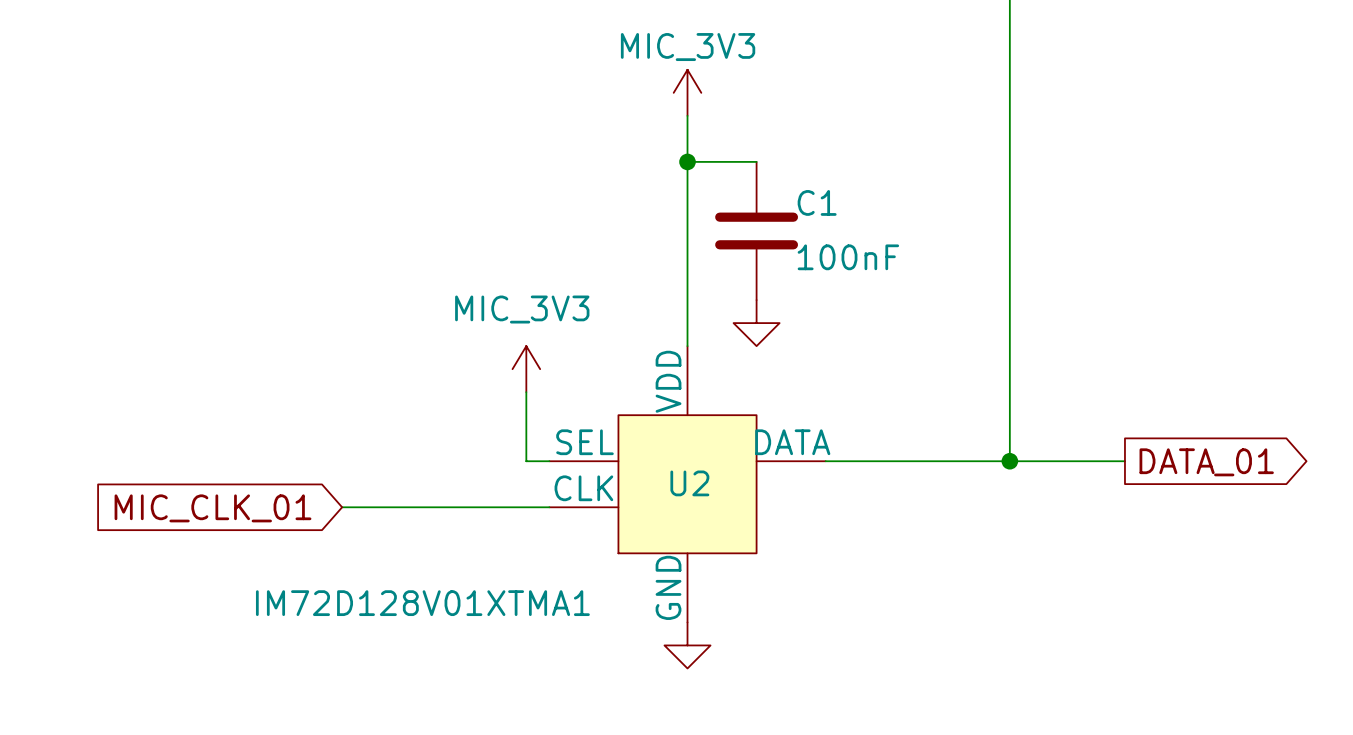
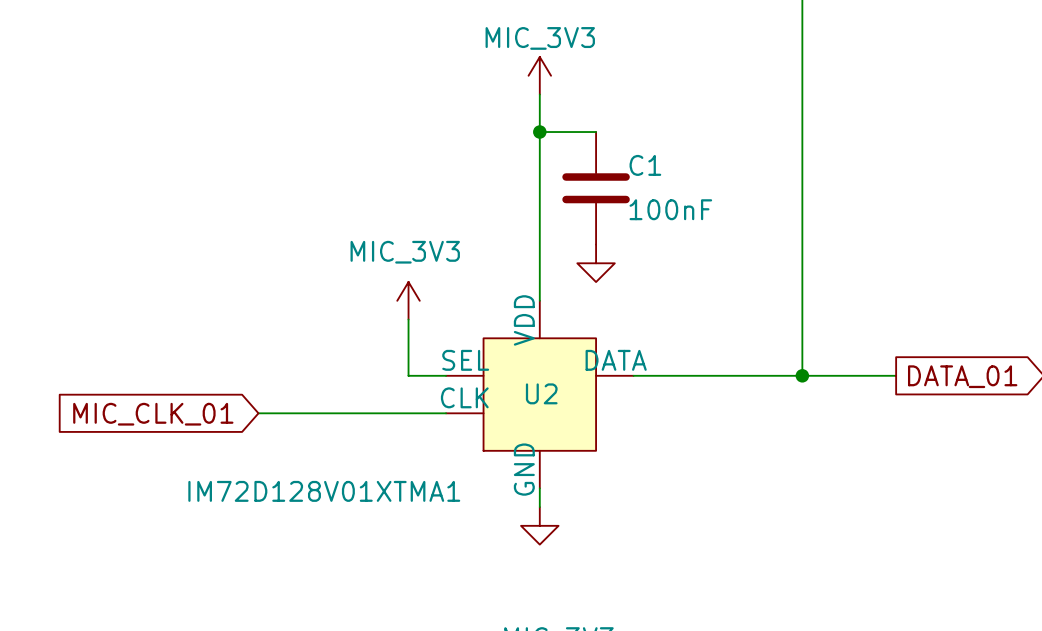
U2 symbol: [549, 346, 826, 623] -> [446, 300, 634, 489]

